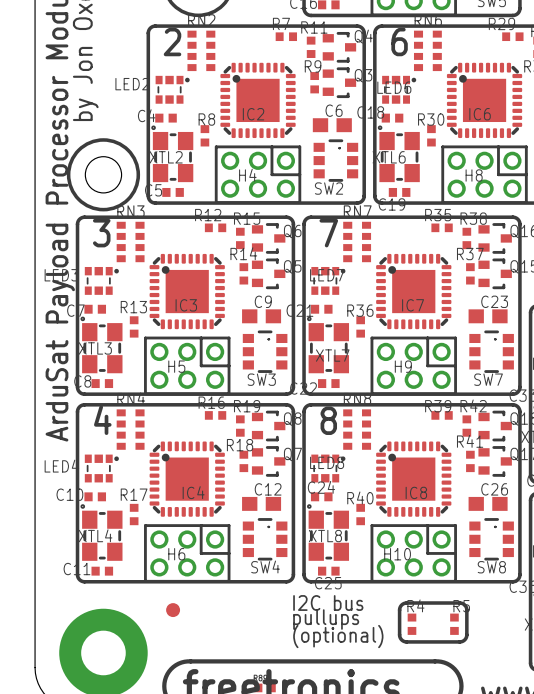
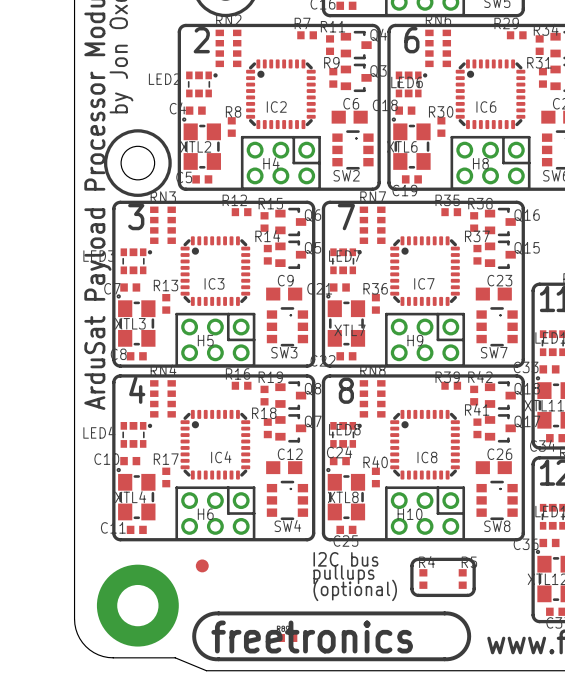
IC2 footprint: [220, 62, 296, 139] -> [246, 59, 316, 130]
IC6 footprint: [446, 62, 523, 139] -> [455, 59, 526, 130]
IC3 footprint: [149, 253, 225, 330] -> [180, 236, 251, 306]
IC7 footprint: [376, 253, 452, 330] -> [390, 236, 460, 306]
IC4 footprint: [149, 441, 225, 517] -> [180, 409, 251, 480]
IC8 footprint: [376, 441, 452, 517] -> [390, 409, 460, 480]

